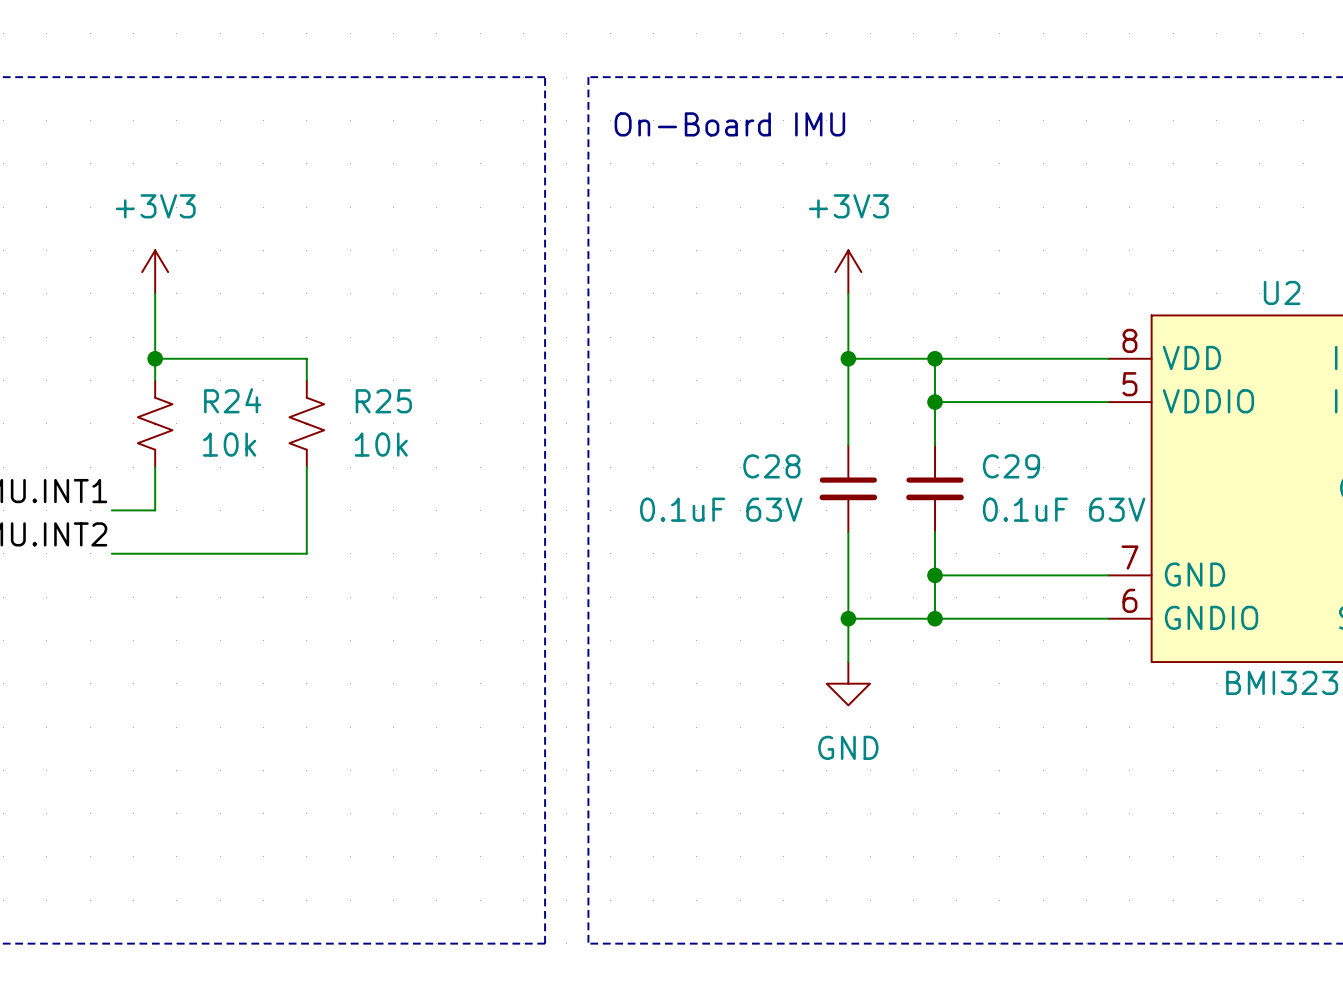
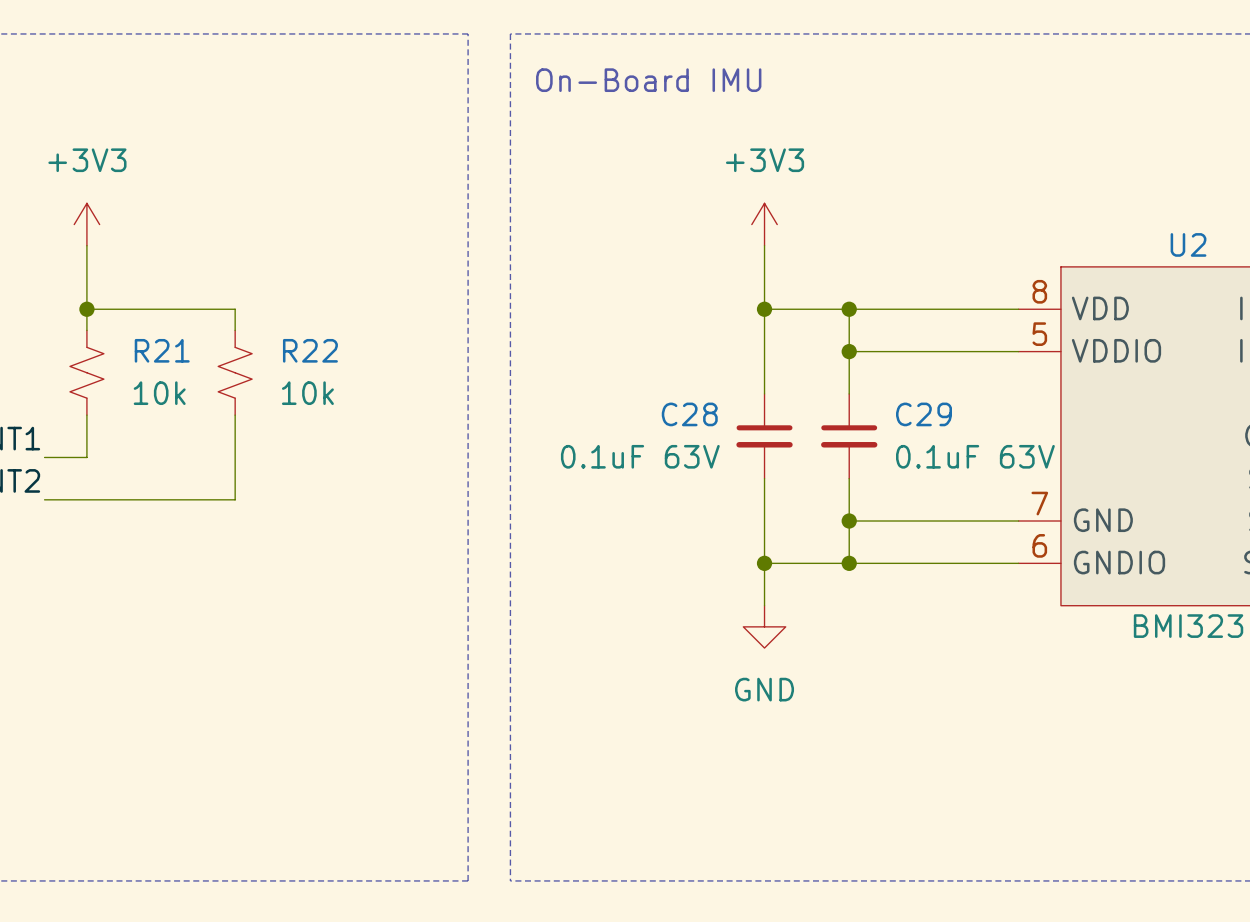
R24 name: R24 (232, 400) -> R21 (162, 350)
R25 name: R25 (383, 401) -> R22 (310, 350)

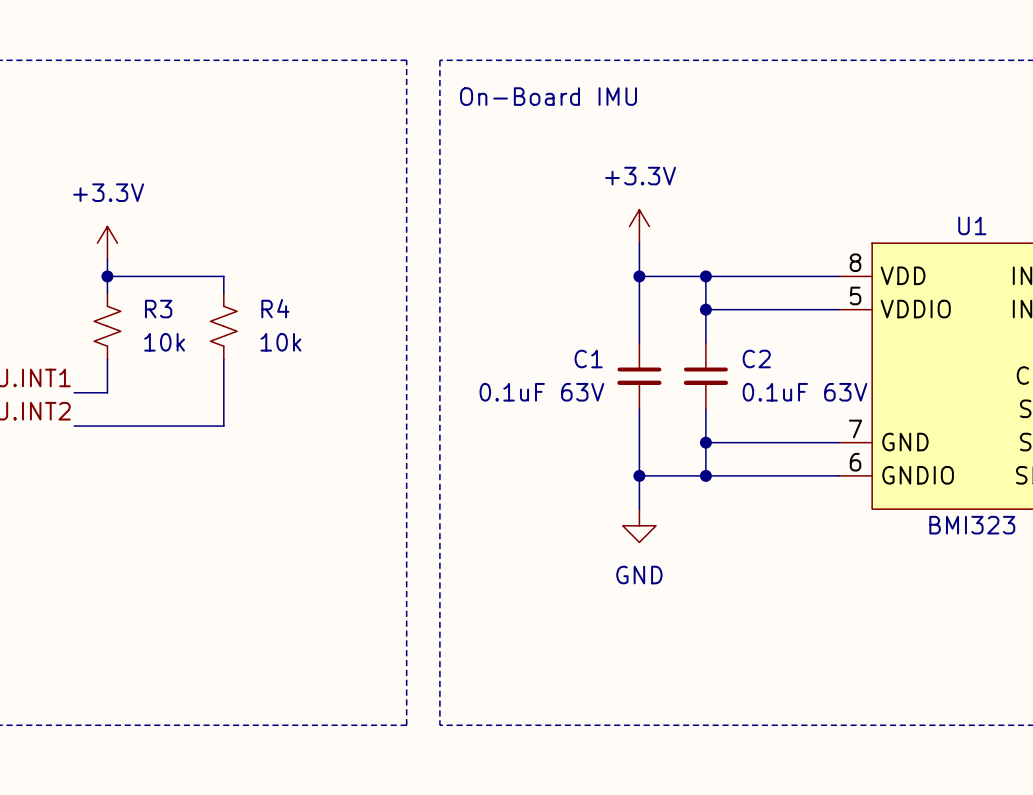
power symbol: +3V3 (86, 224) -> none
power symbol: +3V3 (764, 224) -> none
U2 name: U2 (1188, 244) -> U1 (972, 225)
power symbol: none -> +3.3V (639, 226)
power symbol: none -> +3.3V (107, 243)
R21 name: R21 (162, 350) -> R3 (158, 309)
R22 name: R22 (310, 350) -> R4 (275, 308)
C28 name: C28 (689, 414) -> C1 (588, 359)
C29 name: C29 (923, 414) -> C2 (756, 359)

